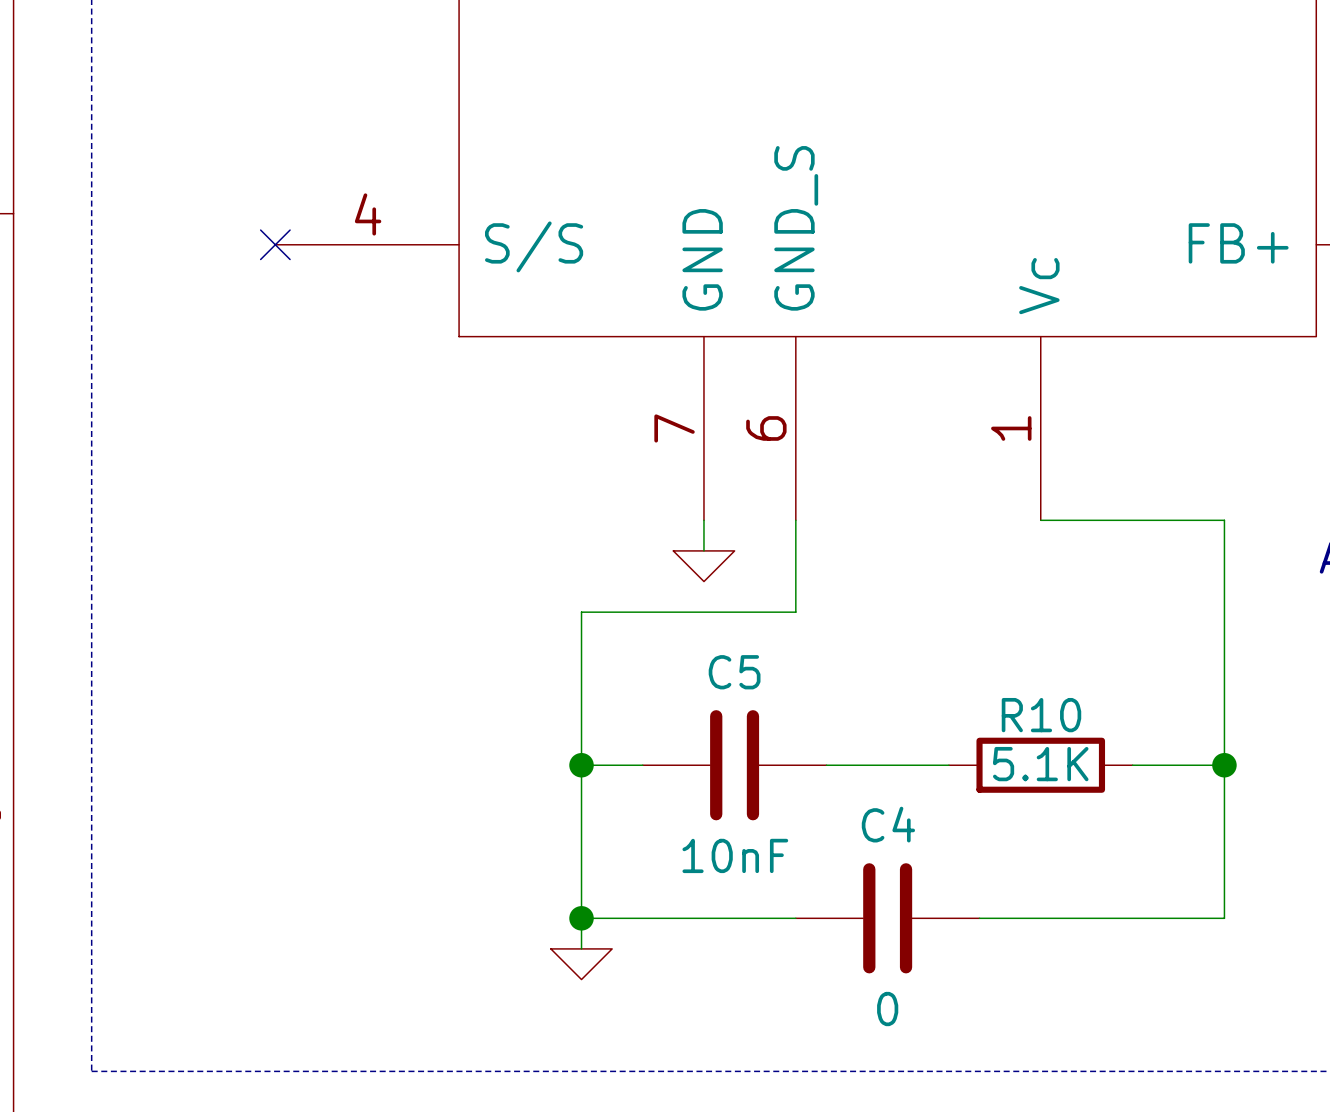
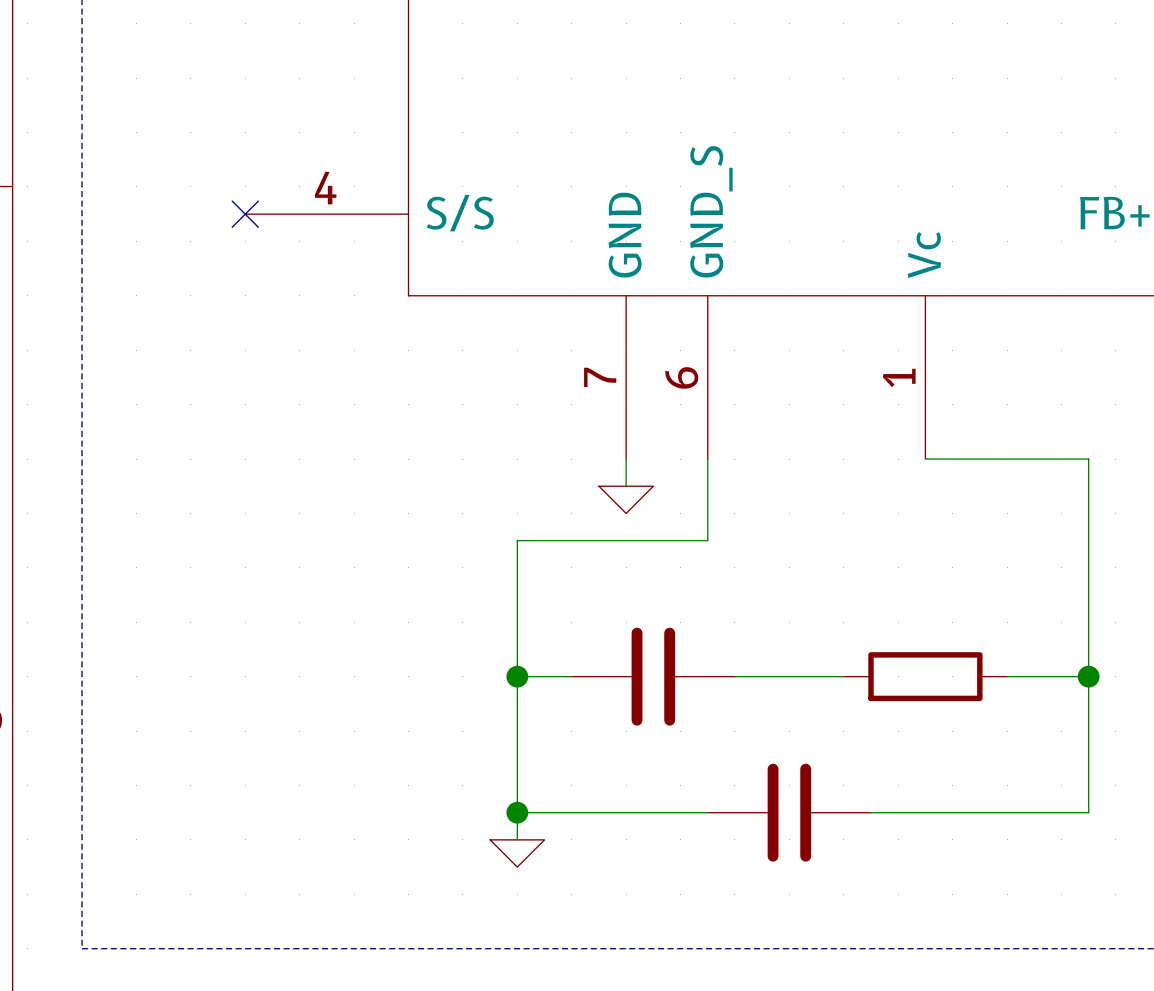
C5 name: C5 (734, 672) -> none
R10 name: R10 (1041, 715) -> none
R10 value: 5.1K (1040, 764) -> none
C4 name: C4 (888, 824) -> none
C5 value: 10nF (735, 855) -> none
C4 value: 0 (887, 1009) -> none

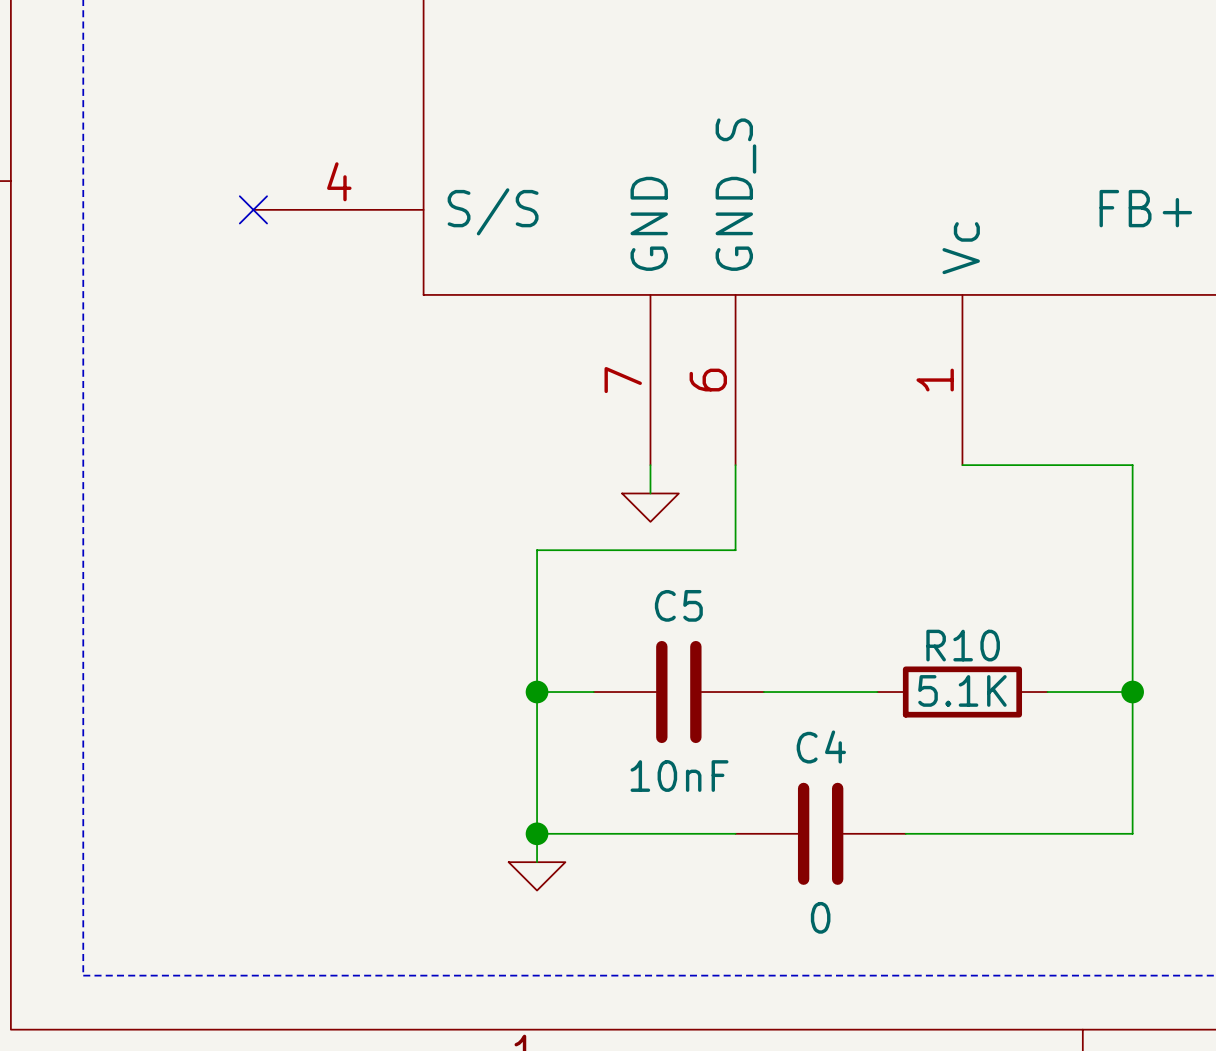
C5 name: none -> C5 (678, 605)
R10 name: none -> R10 (963, 645)
R10 value: none -> 5.1K (962, 690)
C4 name: none -> C4 (821, 746)
C5 value: none -> 10nF (679, 776)
C4 value: none -> 0 (820, 917)

